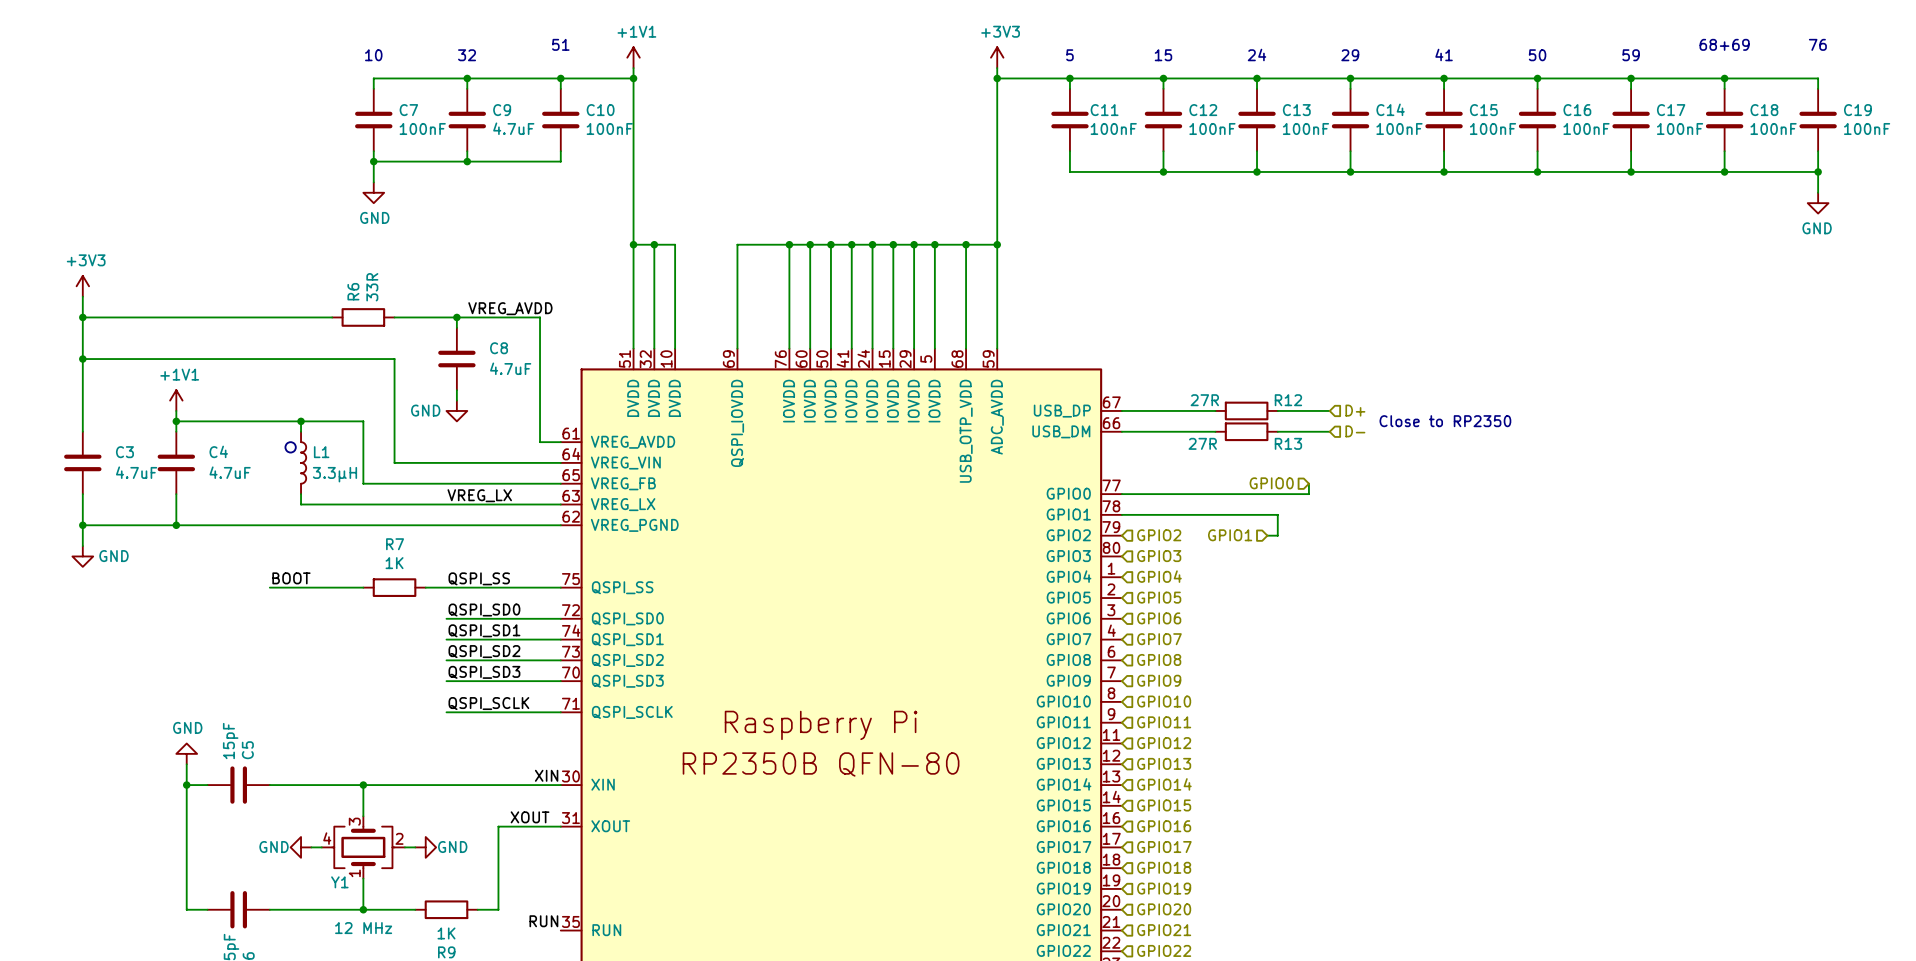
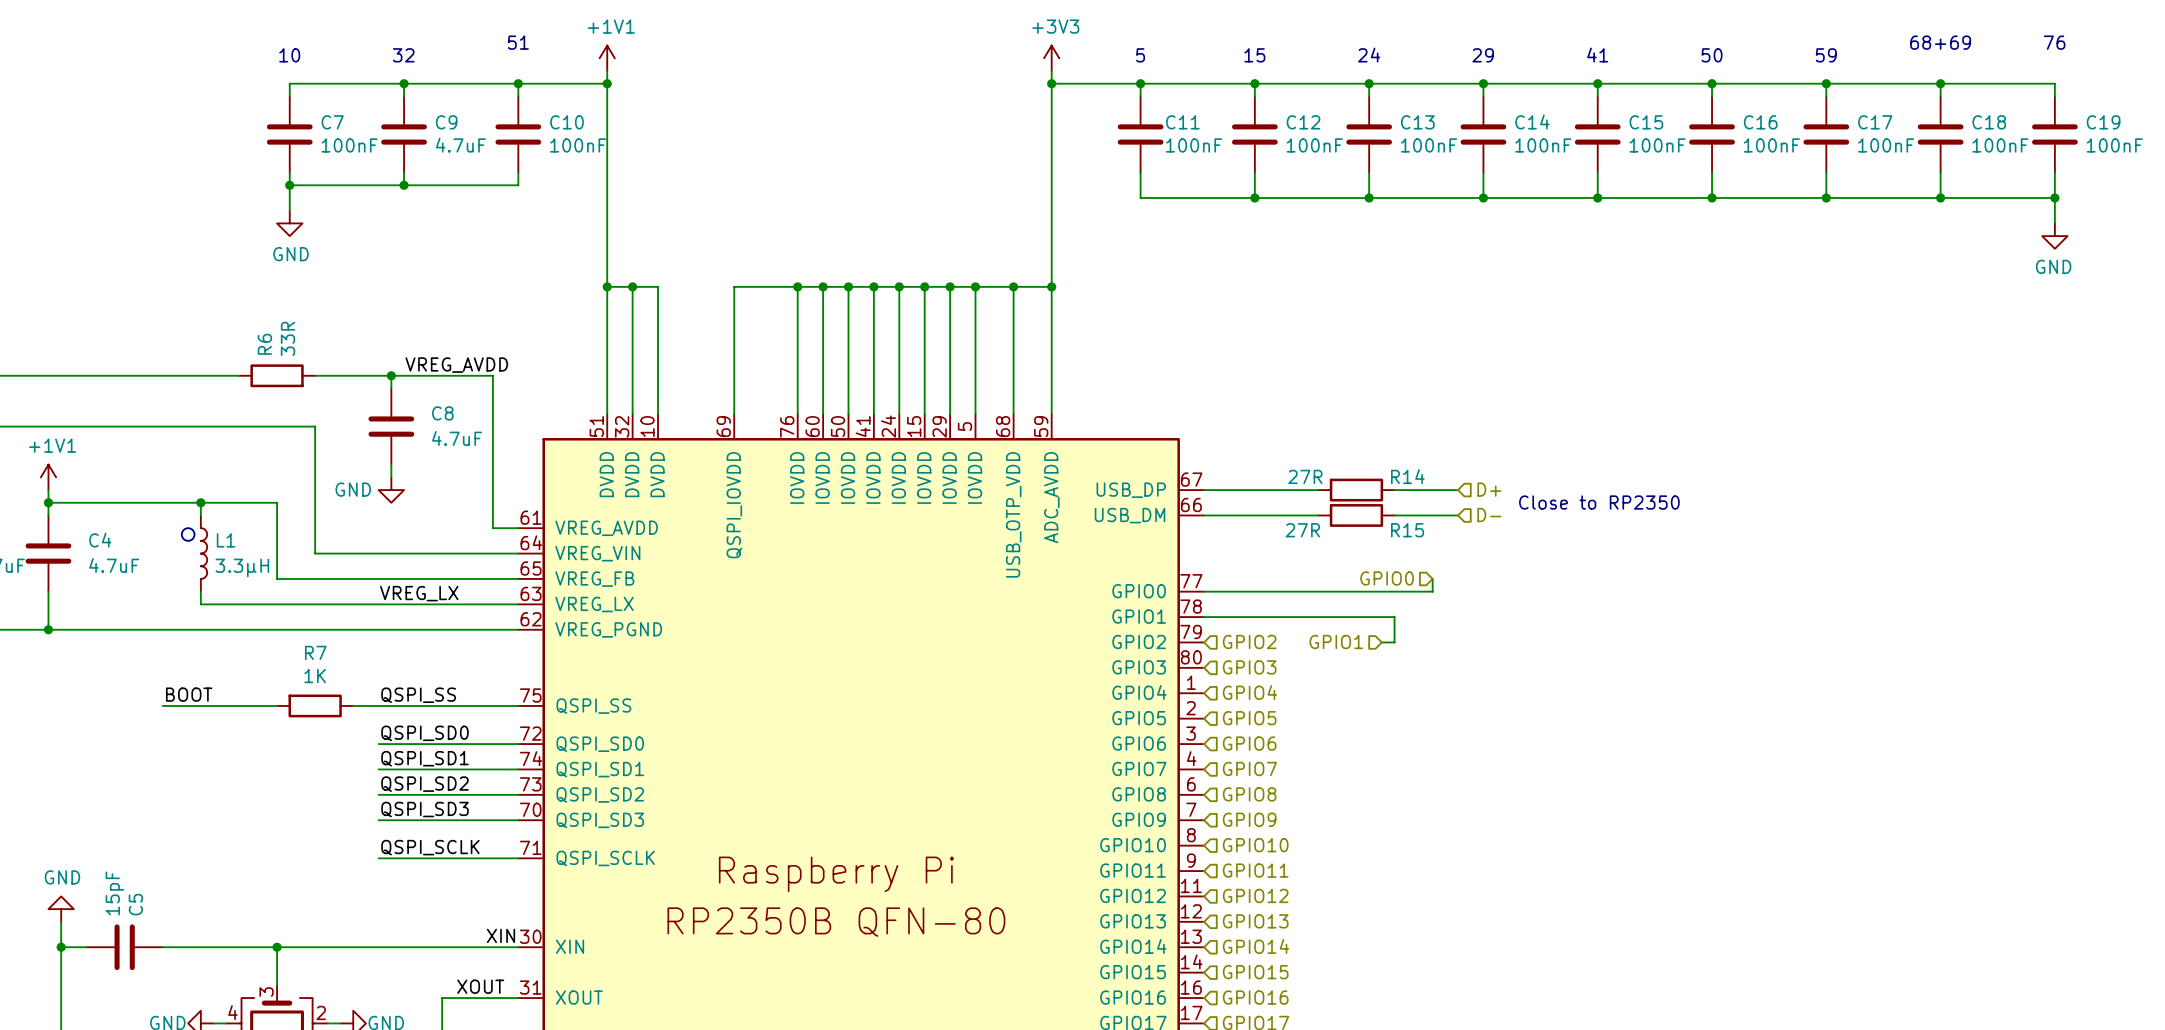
R12 name: R12 (1288, 400) -> R14 (1407, 476)
R13 name: R13 (1288, 443) -> R15 (1407, 530)

